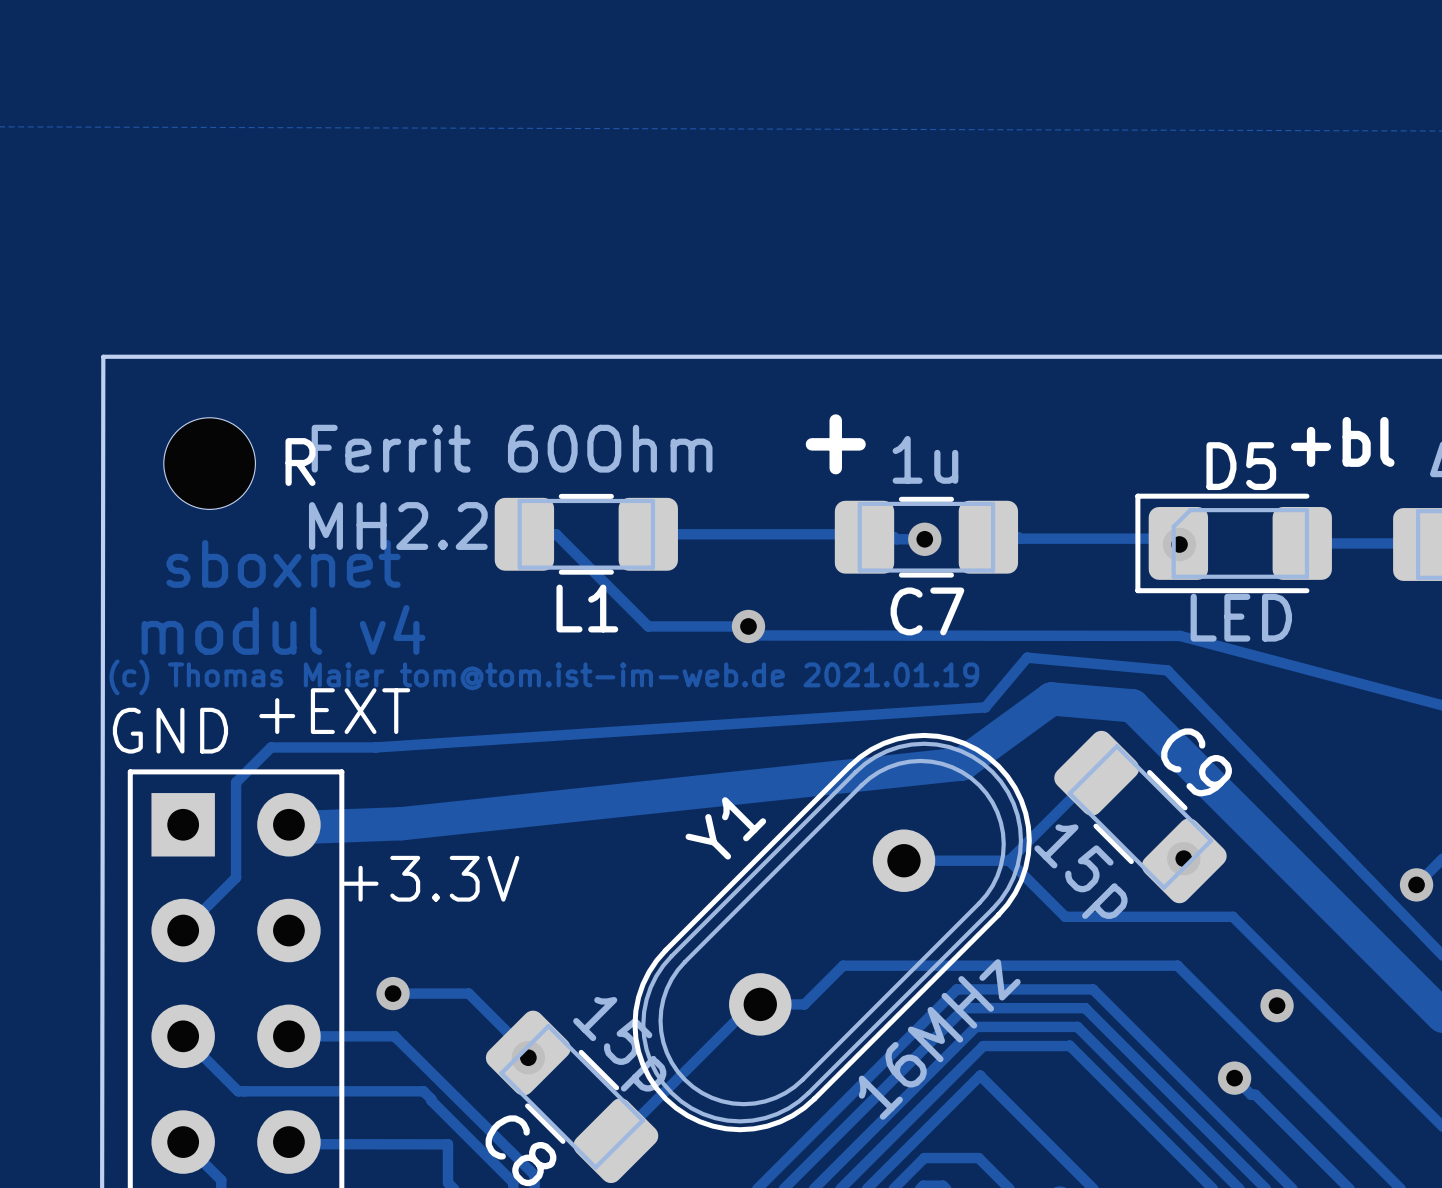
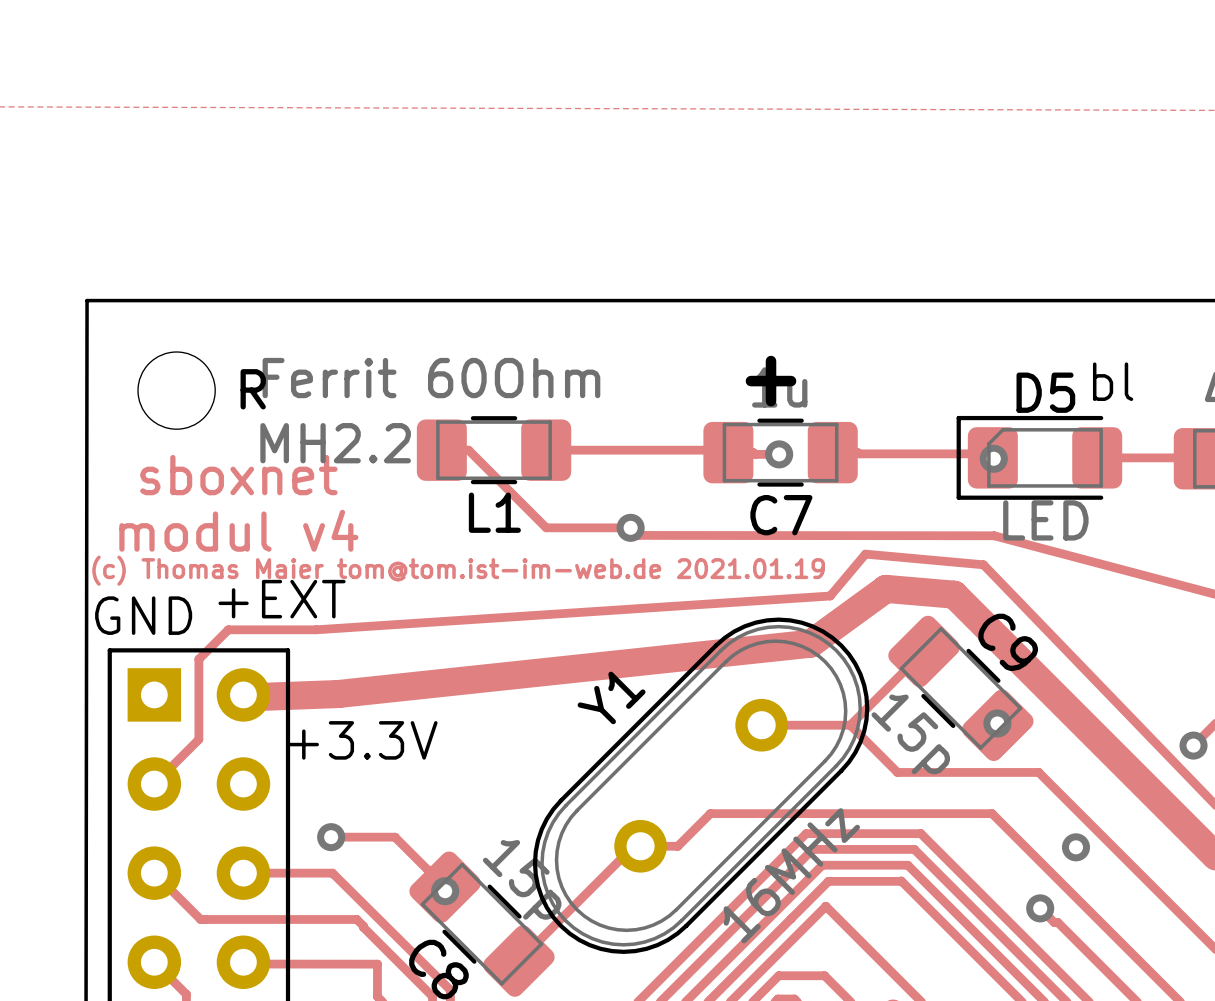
text: +bl (1342, 441) -> bl (1113, 381)
text position: + (835, 444) -> + (771, 381)

